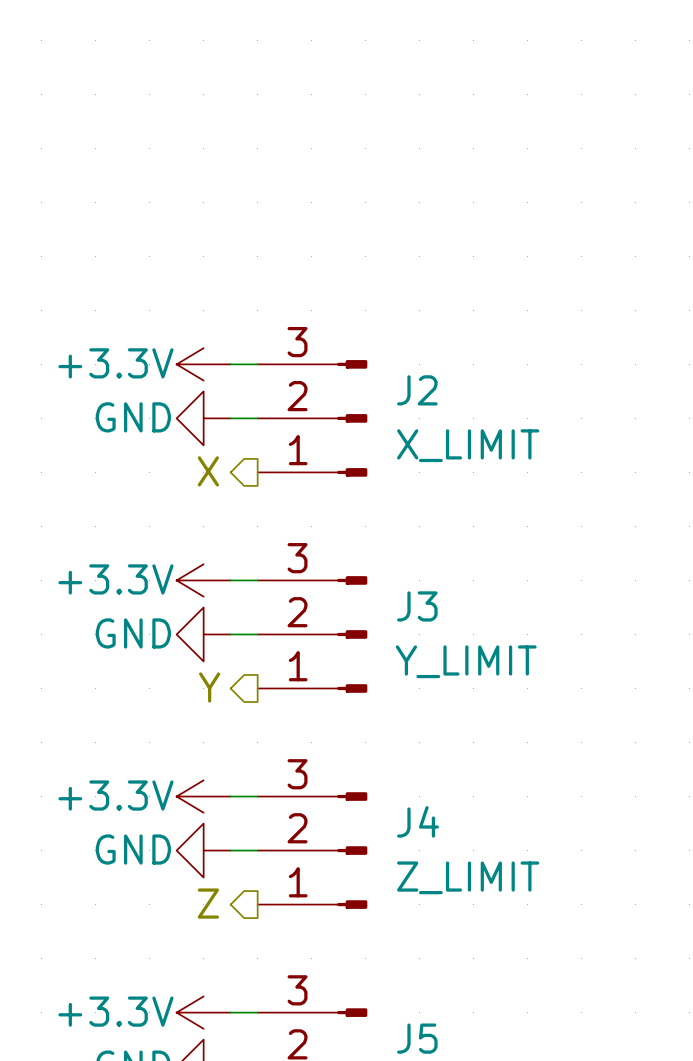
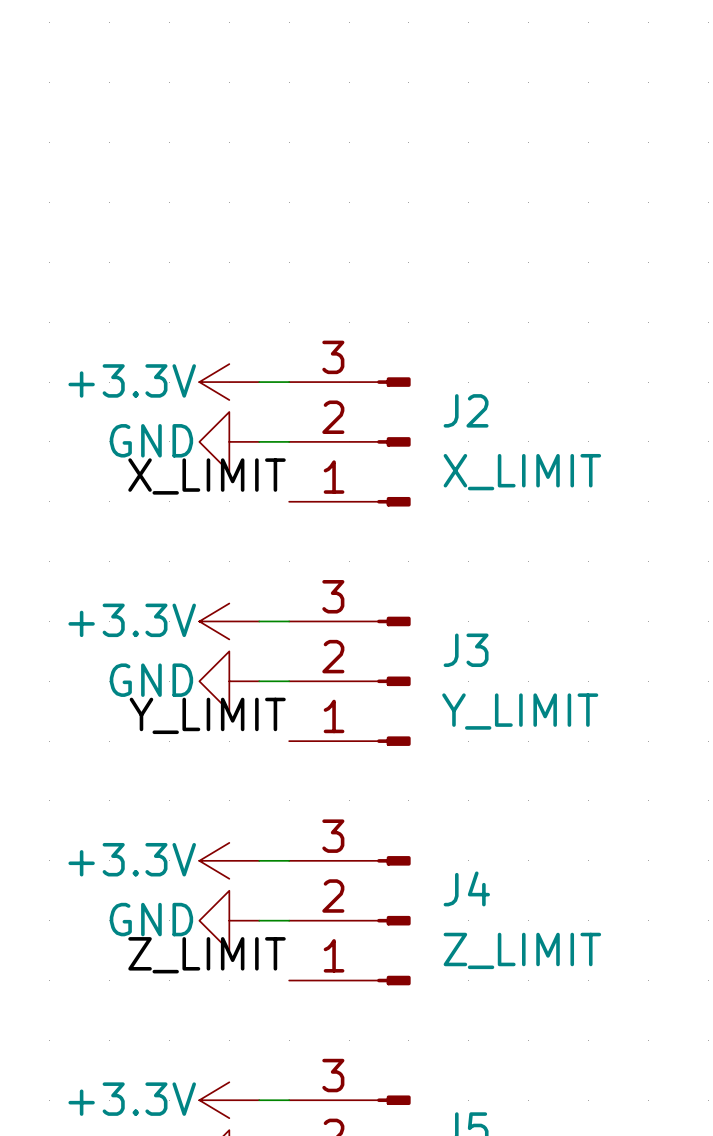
label: none -> X_LIMIT (207, 476)
hierarchical label: X (208, 471) -> none
label: none -> Y_LIMIT (207, 715)
hierarchical label: Y (209, 687) -> none
label: none -> Z_LIMIT (207, 955)
hierarchical label: Z (208, 903) -> none

